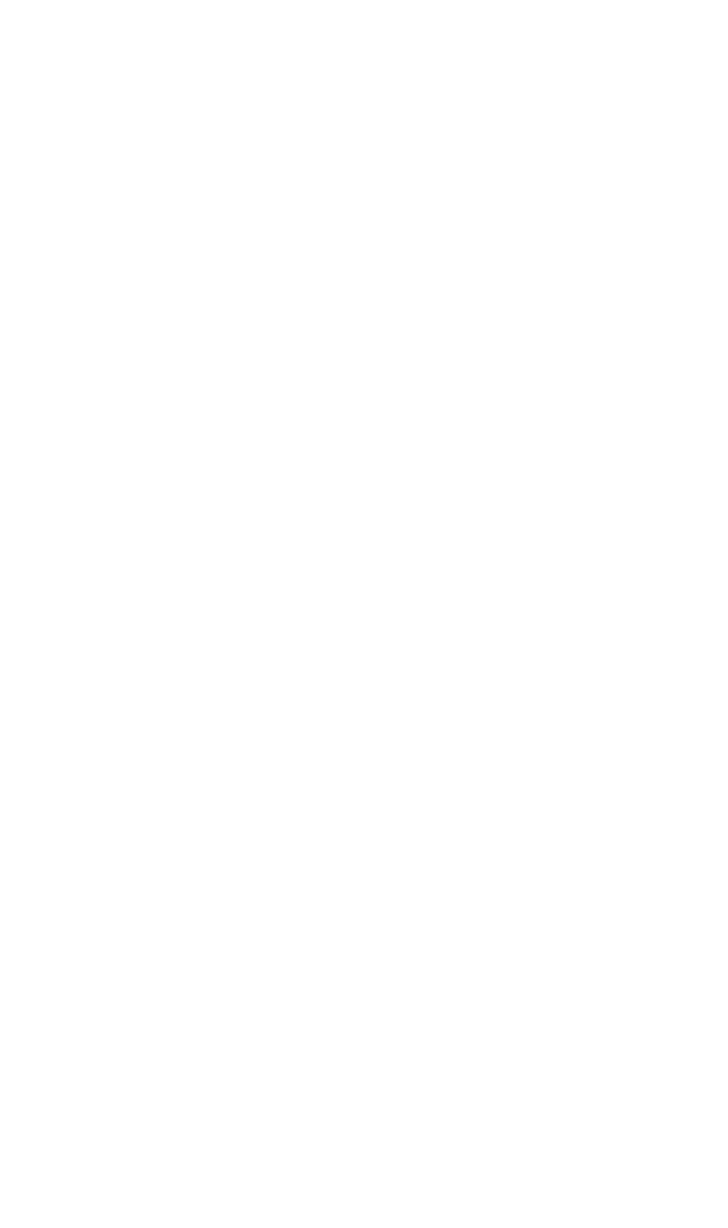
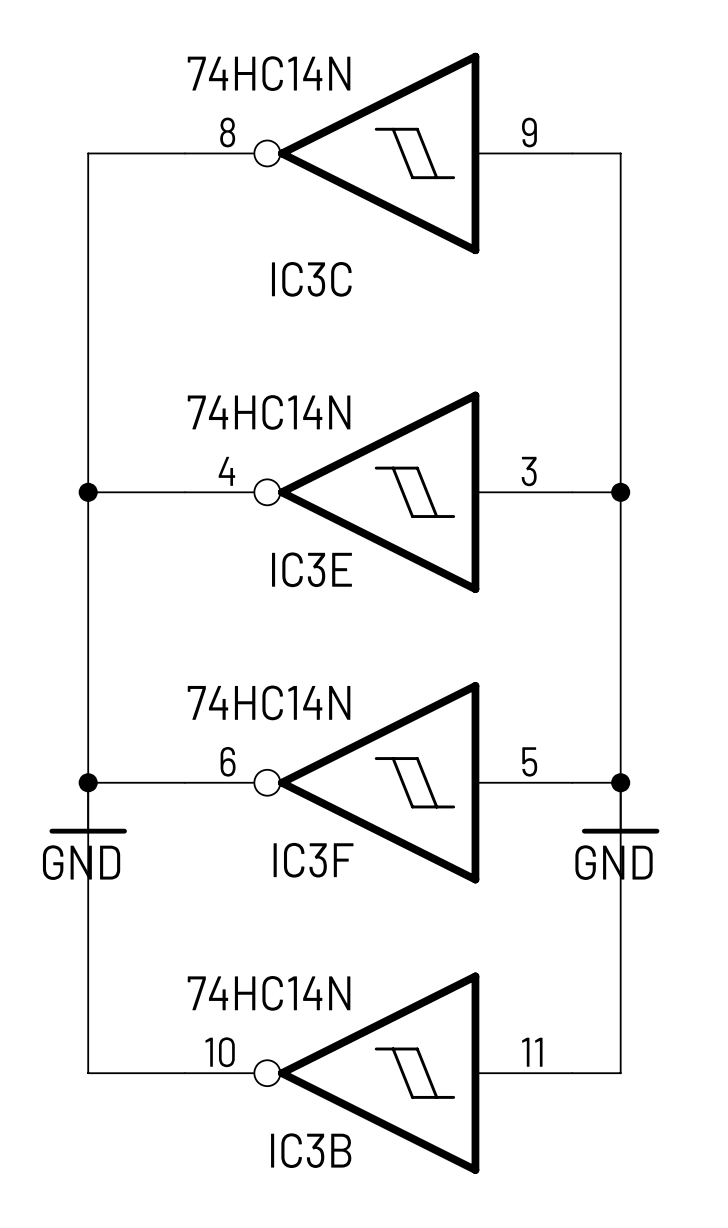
wire: none -> (185, 153) (88, 153) (88, 1073) (185, 1073)
IC3C: none -> 74HC14N (378, 153)
wire: none -> (572, 153) (620, 153) (620, 1073) (572, 1073)
wire: none -> (88, 492) (185, 492)
junction: none -> (88, 492)
IC3E: none -> 74HC14N (378, 492)
wire: none -> (572, 492) (620, 492)
junction: none -> (620, 492)
wire: none -> (88, 782) (185, 782)
junction: none -> (88, 782)
IC3F: none -> 74HC14N (378, 782)
wire: none -> (572, 782) (620, 782)
junction: none -> (620, 782)
power symbol: none -> GND (88, 808)
power symbol: none -> GND (620, 808)
IC3B: none -> 74HC14N (378, 1073)

